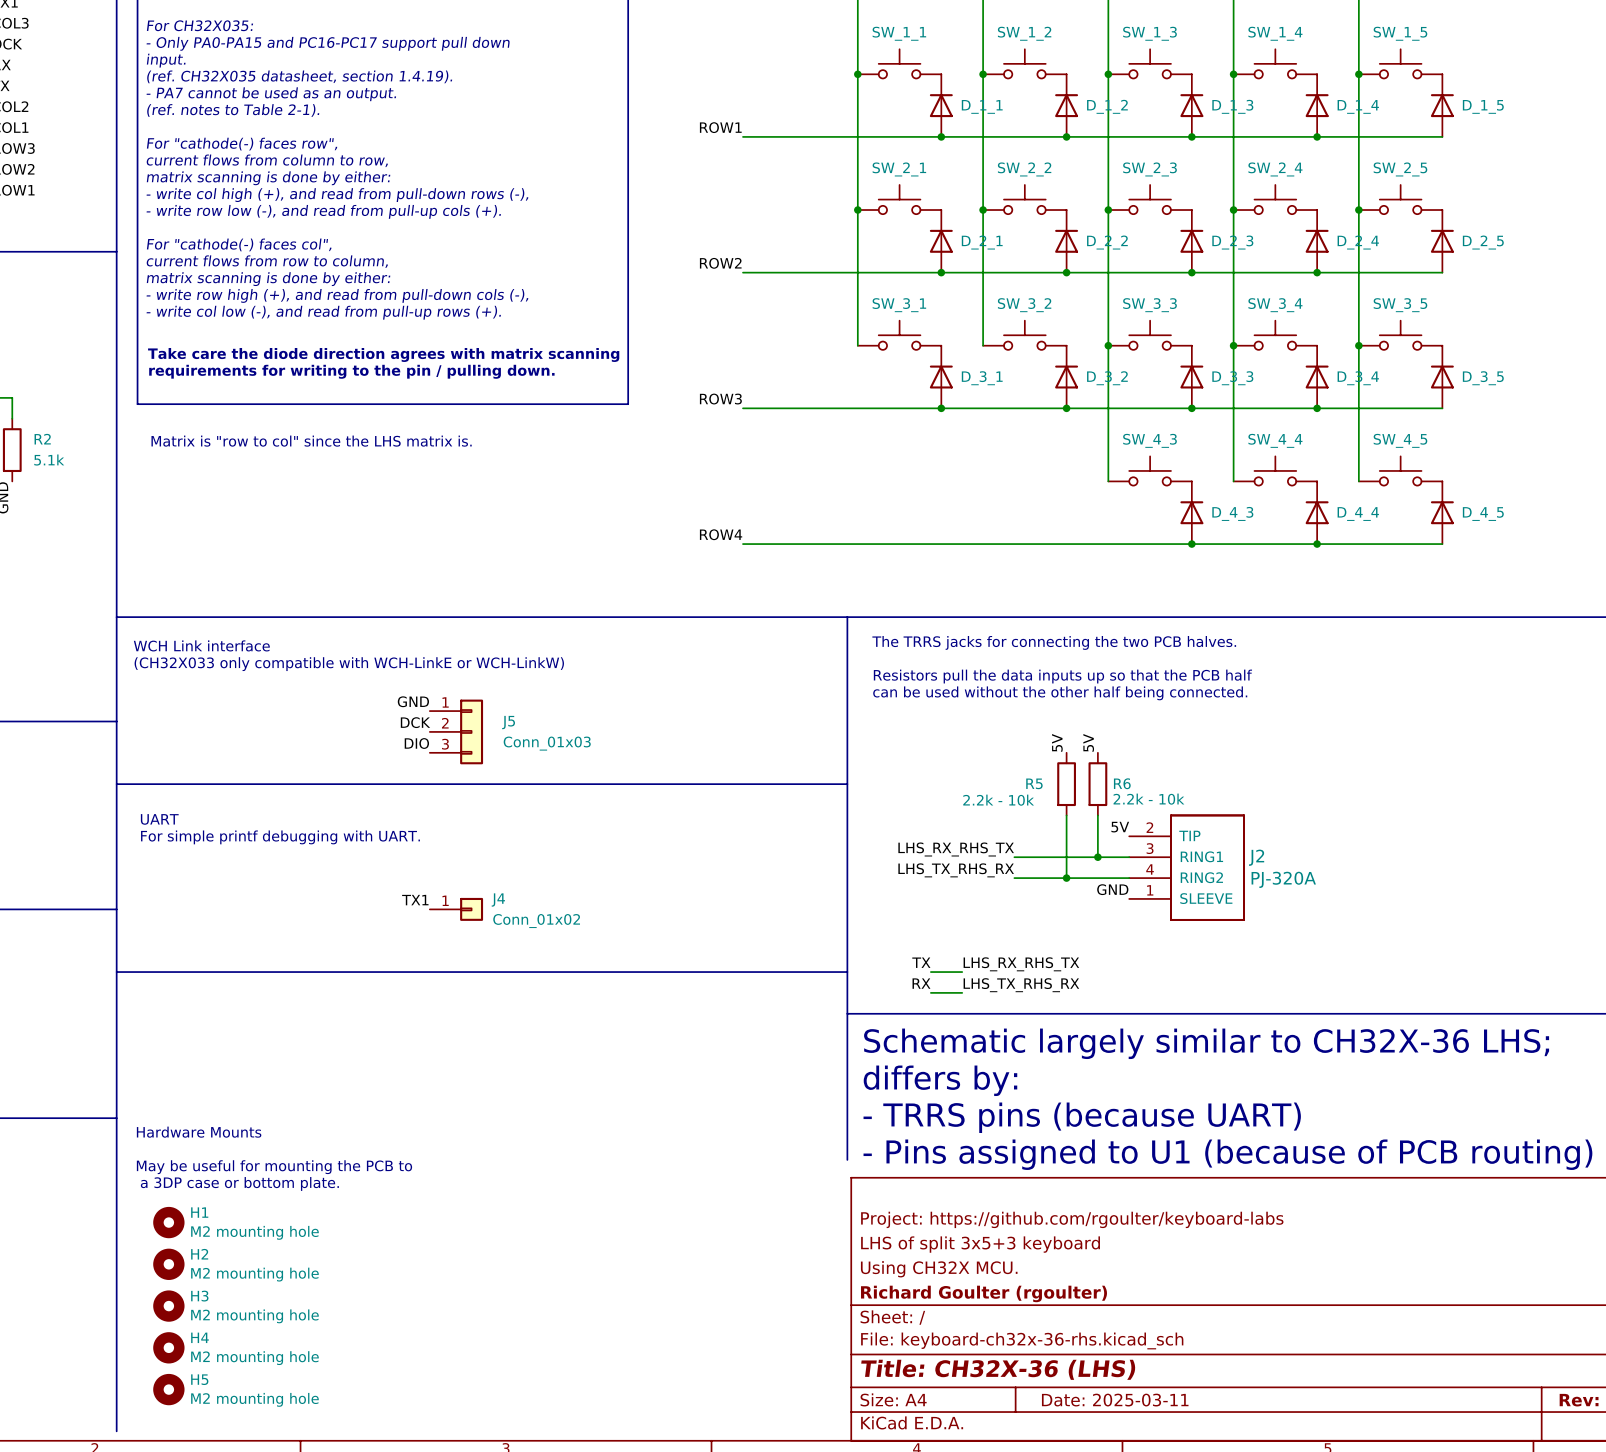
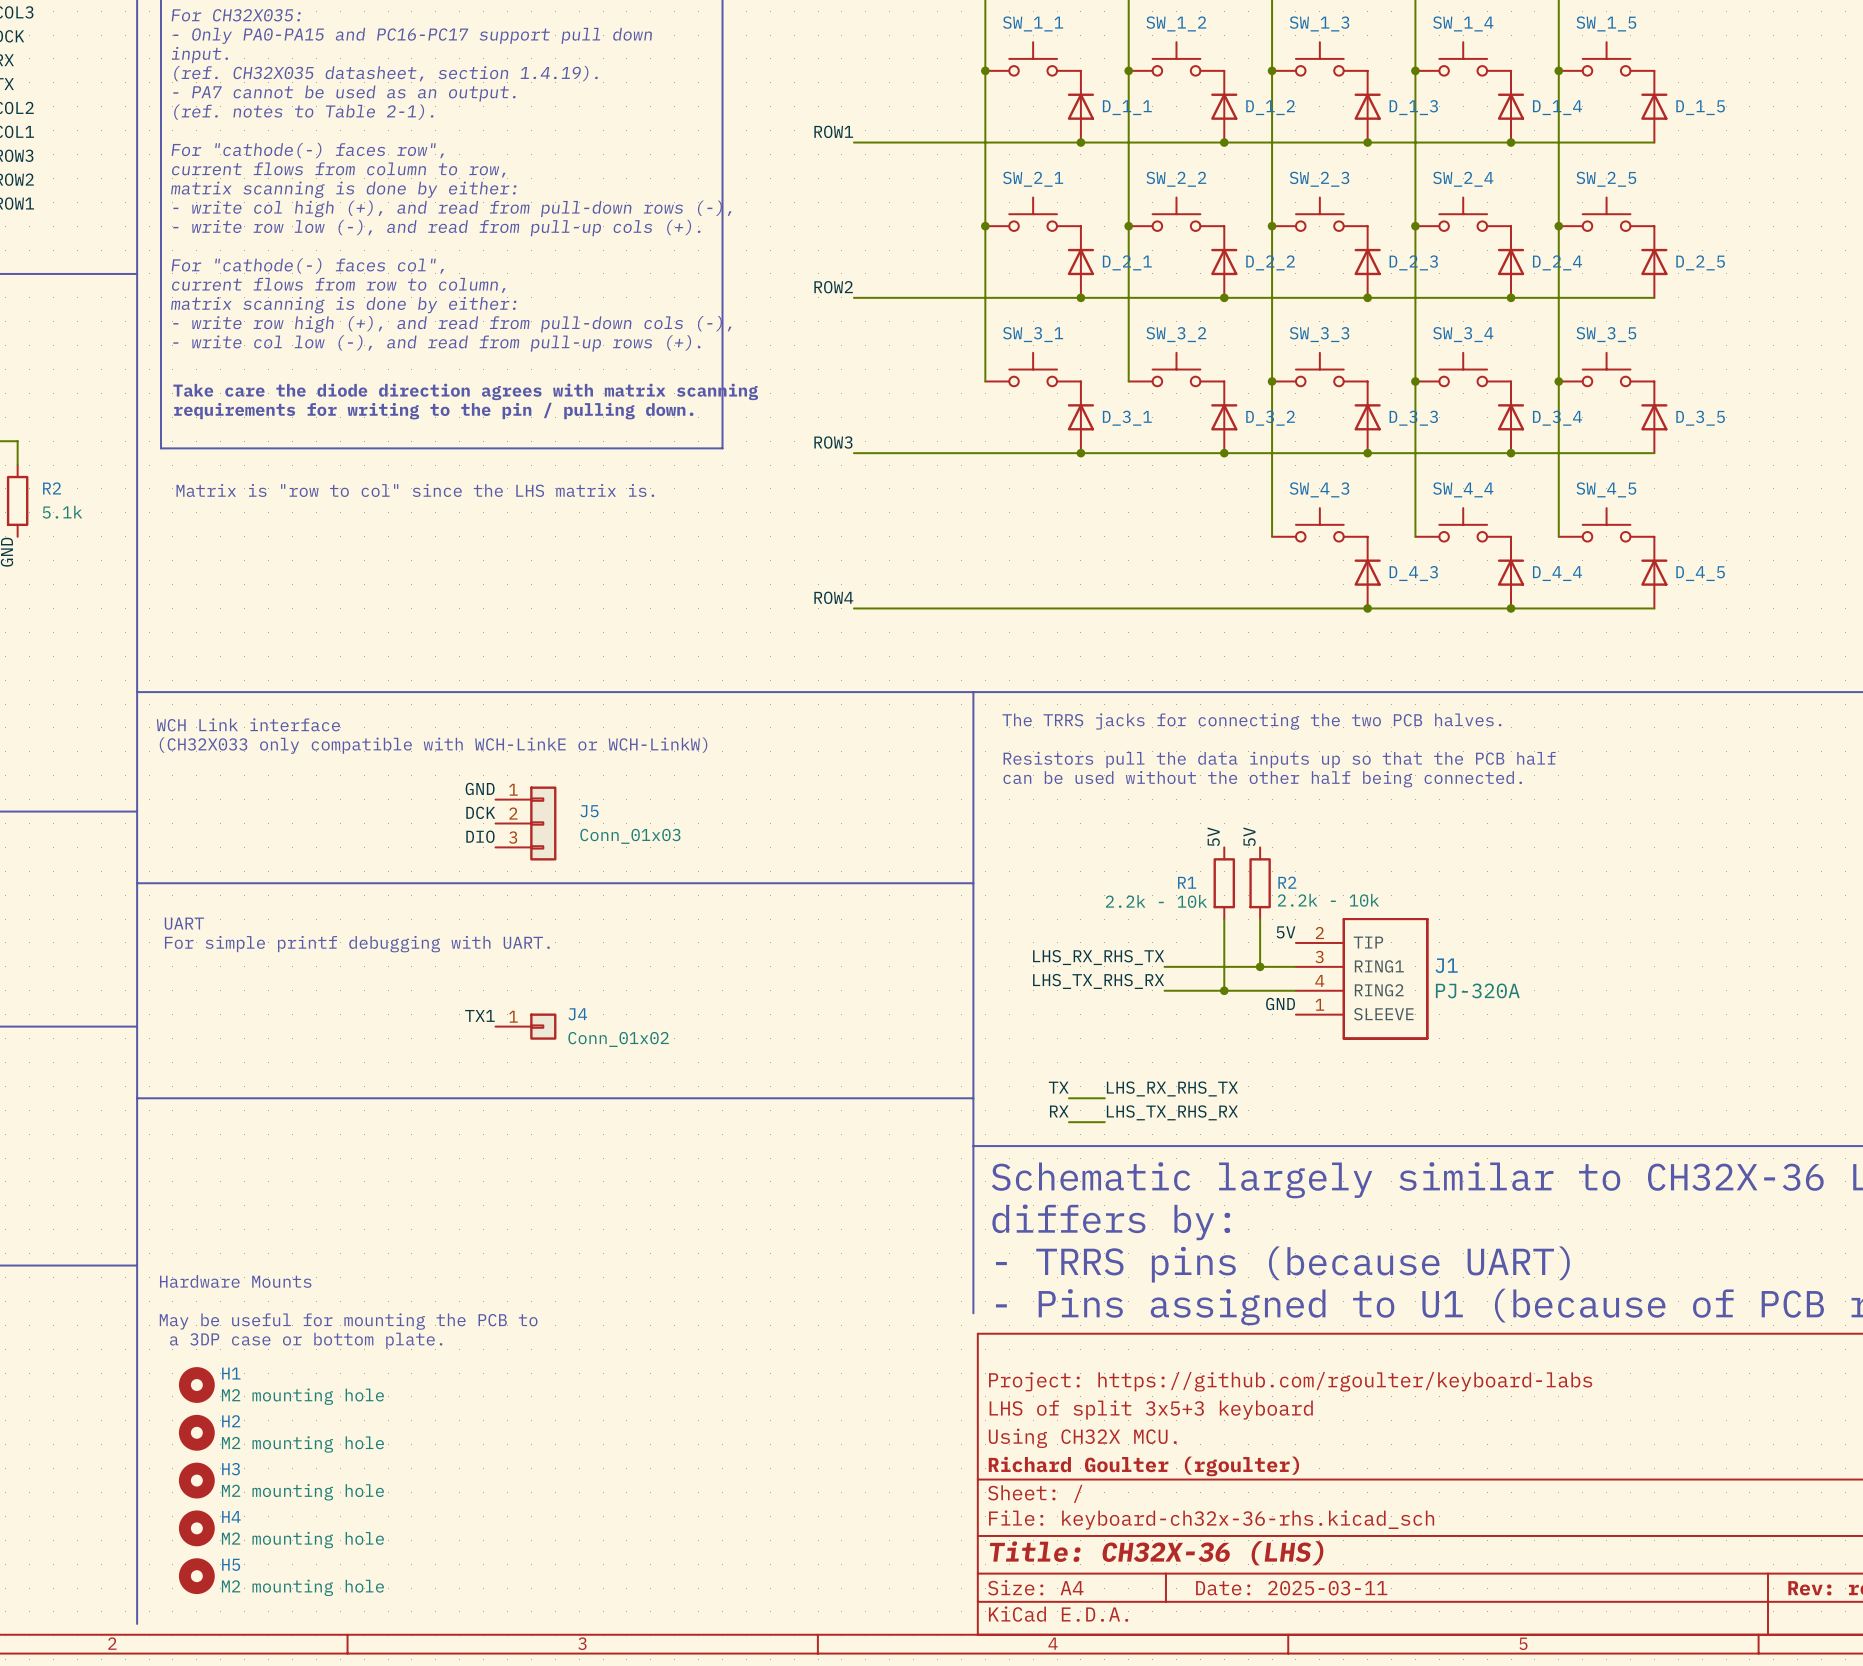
R5 name: R5 (1034, 783) -> R1 (1187, 882)
R6 name: R6 (1122, 783) -> R2 (1287, 882)
J2 name: J2 (1256, 857) -> J1 (1446, 965)

